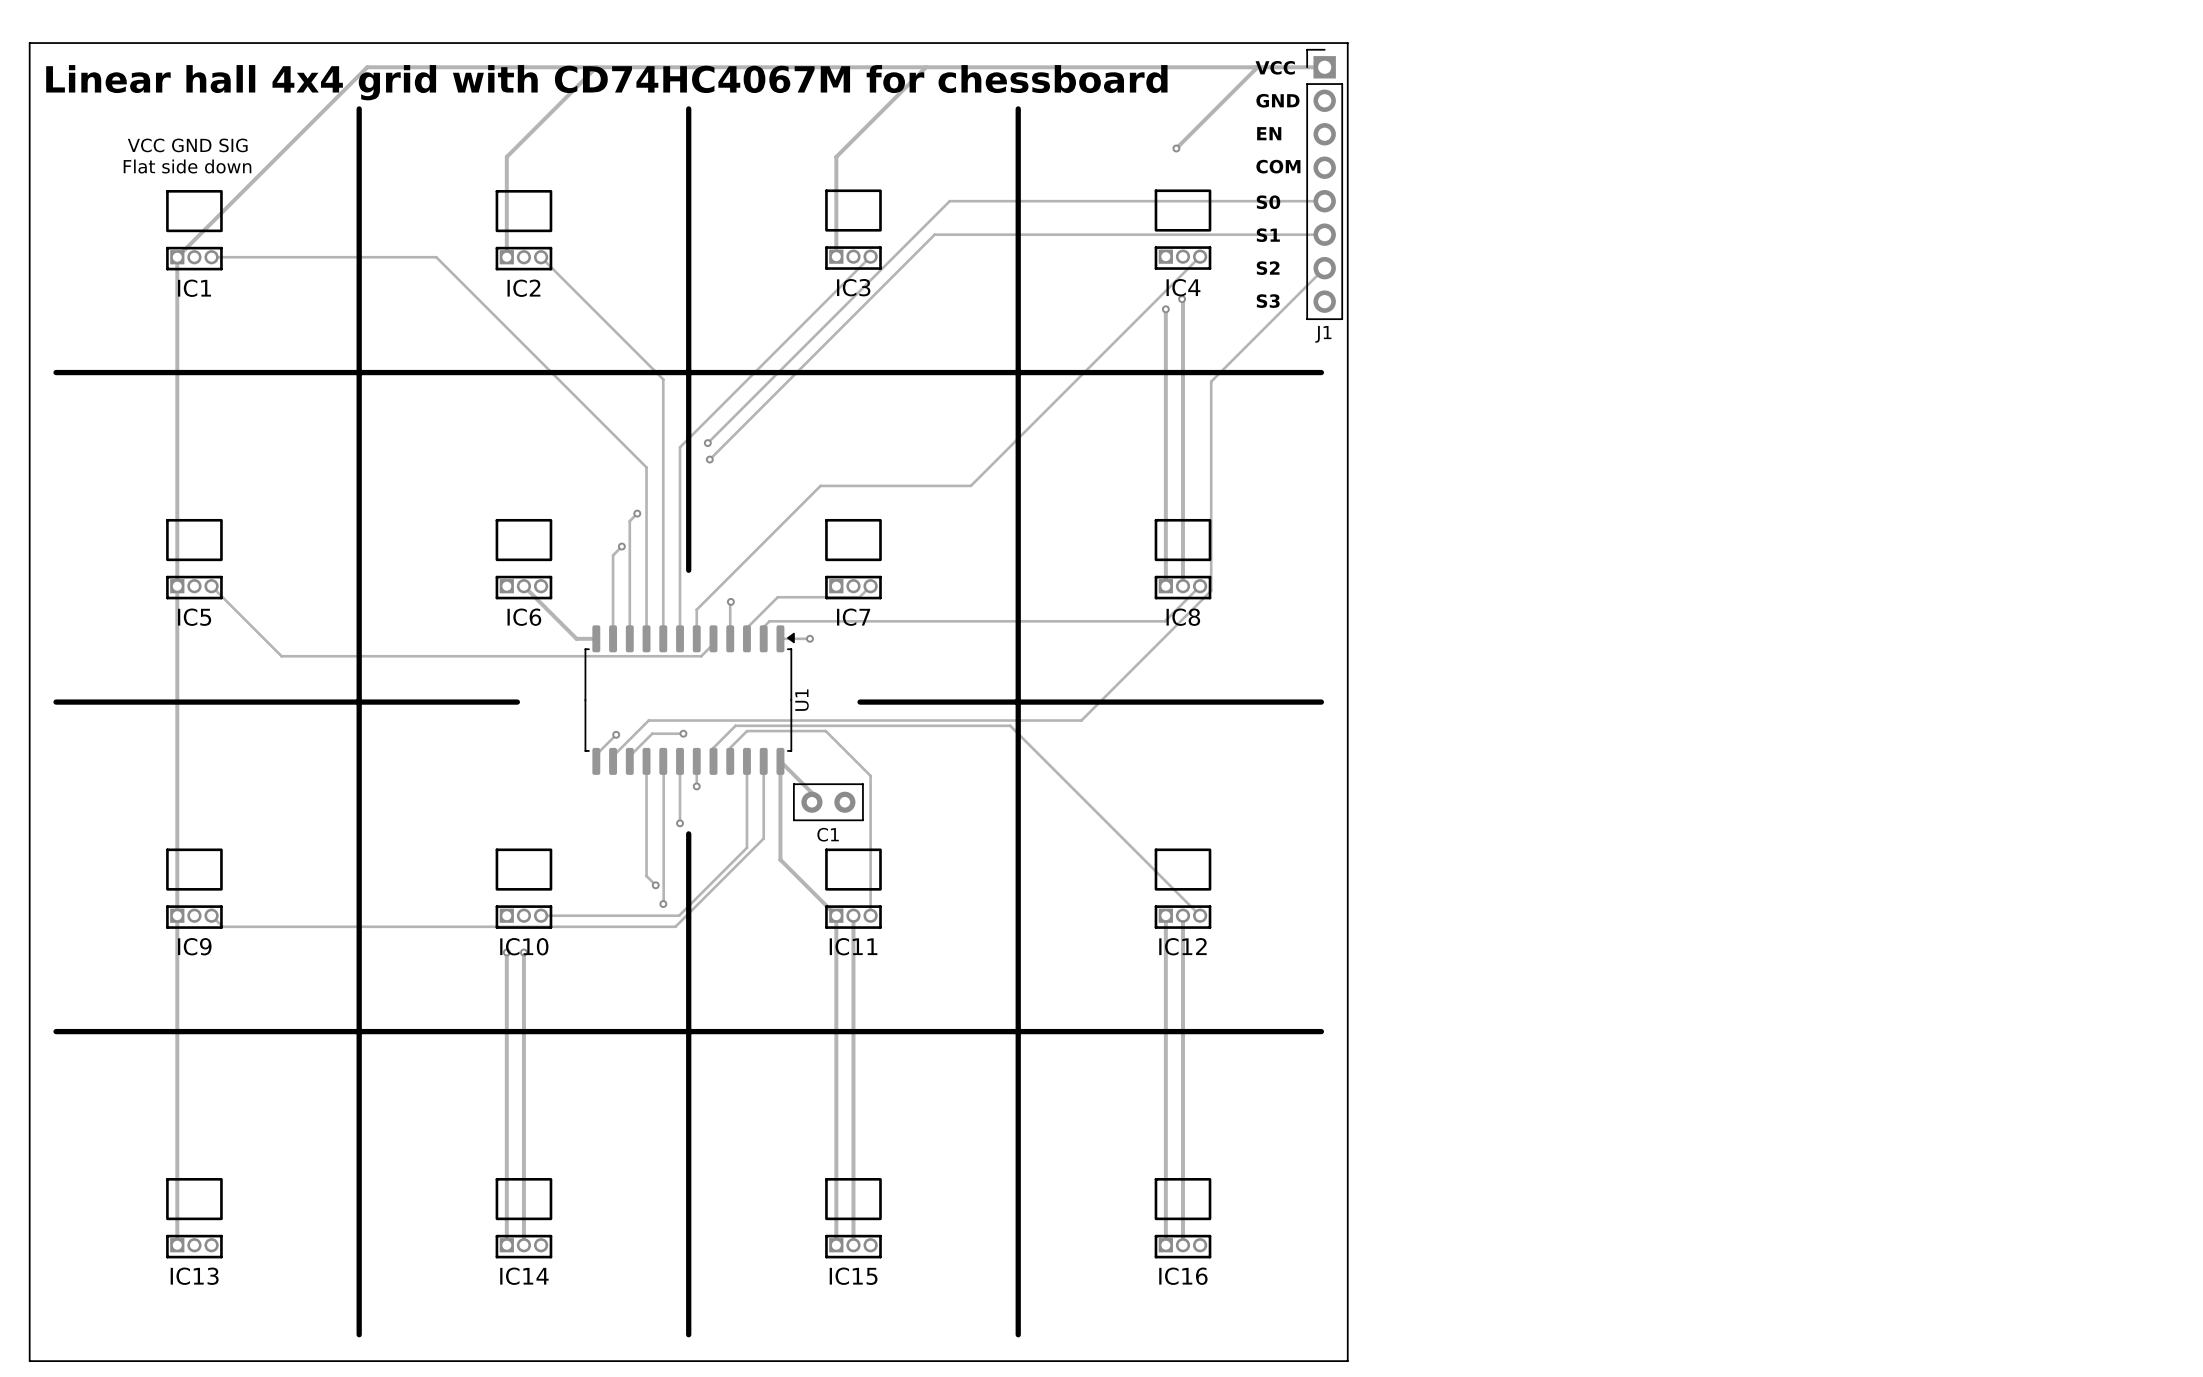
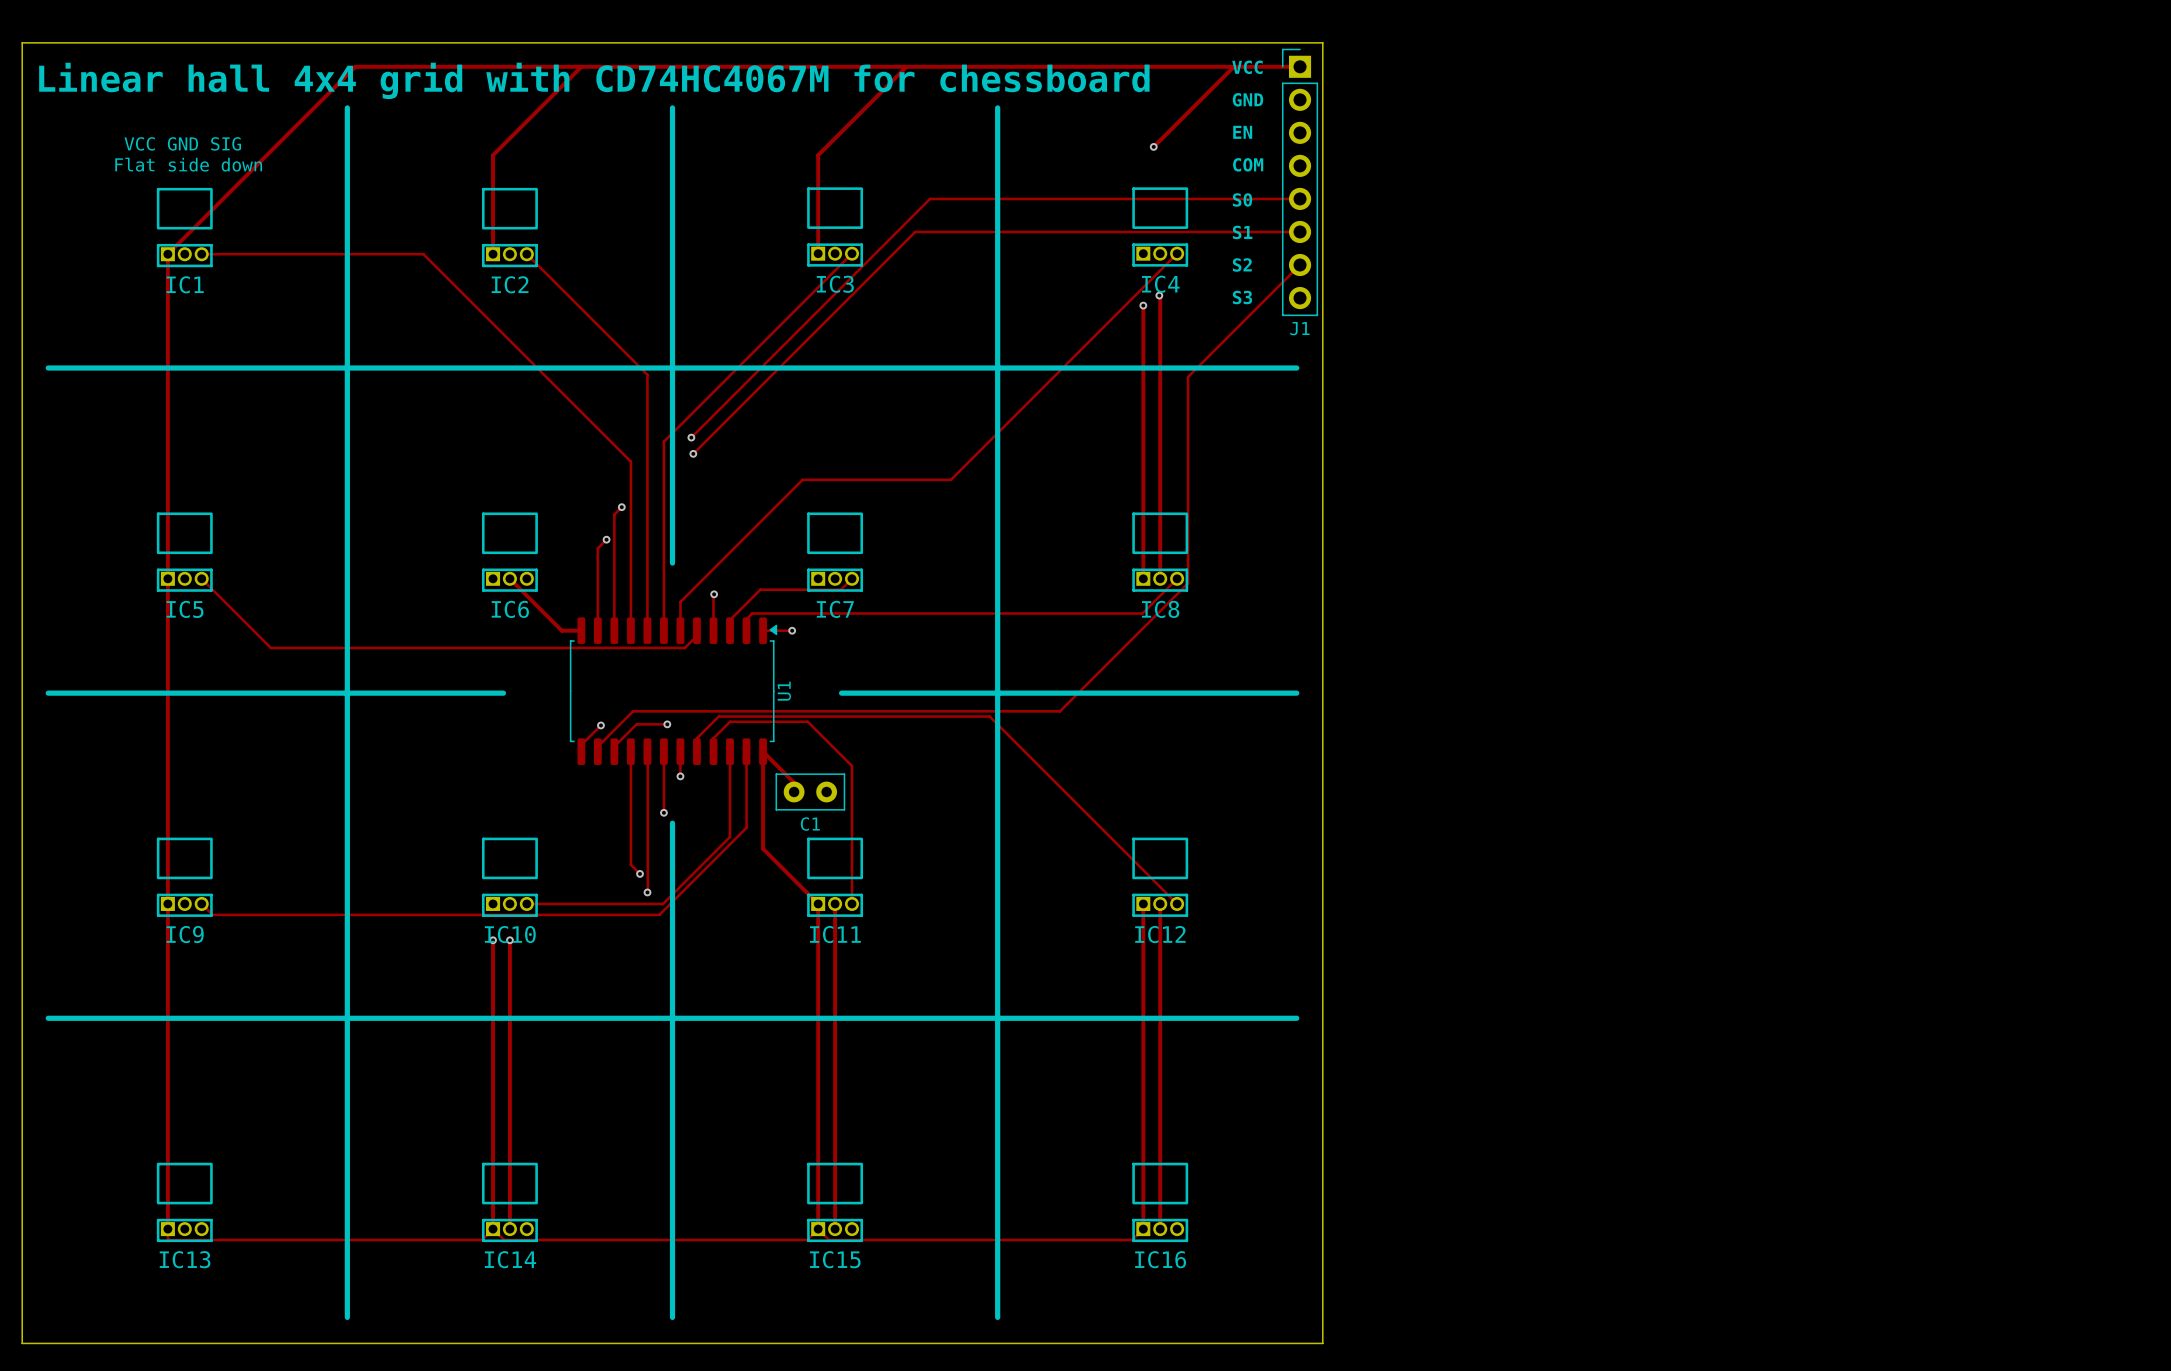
track: none -> (167, 1229) (169, 1240) (482, 1240) (493, 1229)
track: none -> (493, 1229) (504, 1240) (807, 1240) (818, 1229) (829, 1240) (1132, 1240) (1143, 1229)

